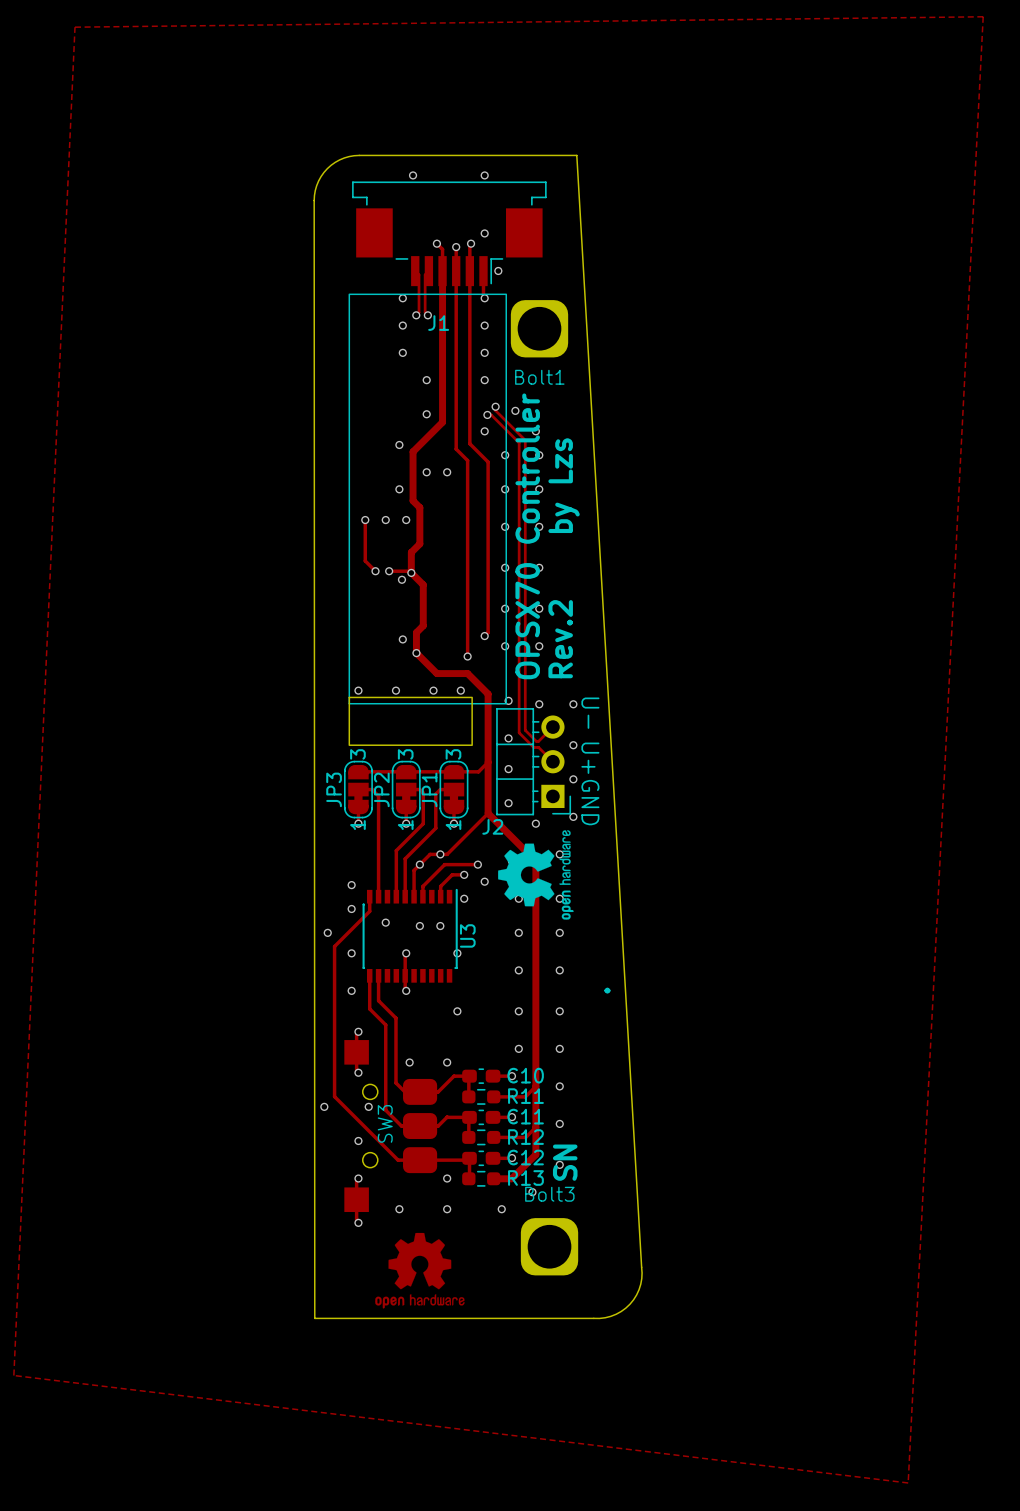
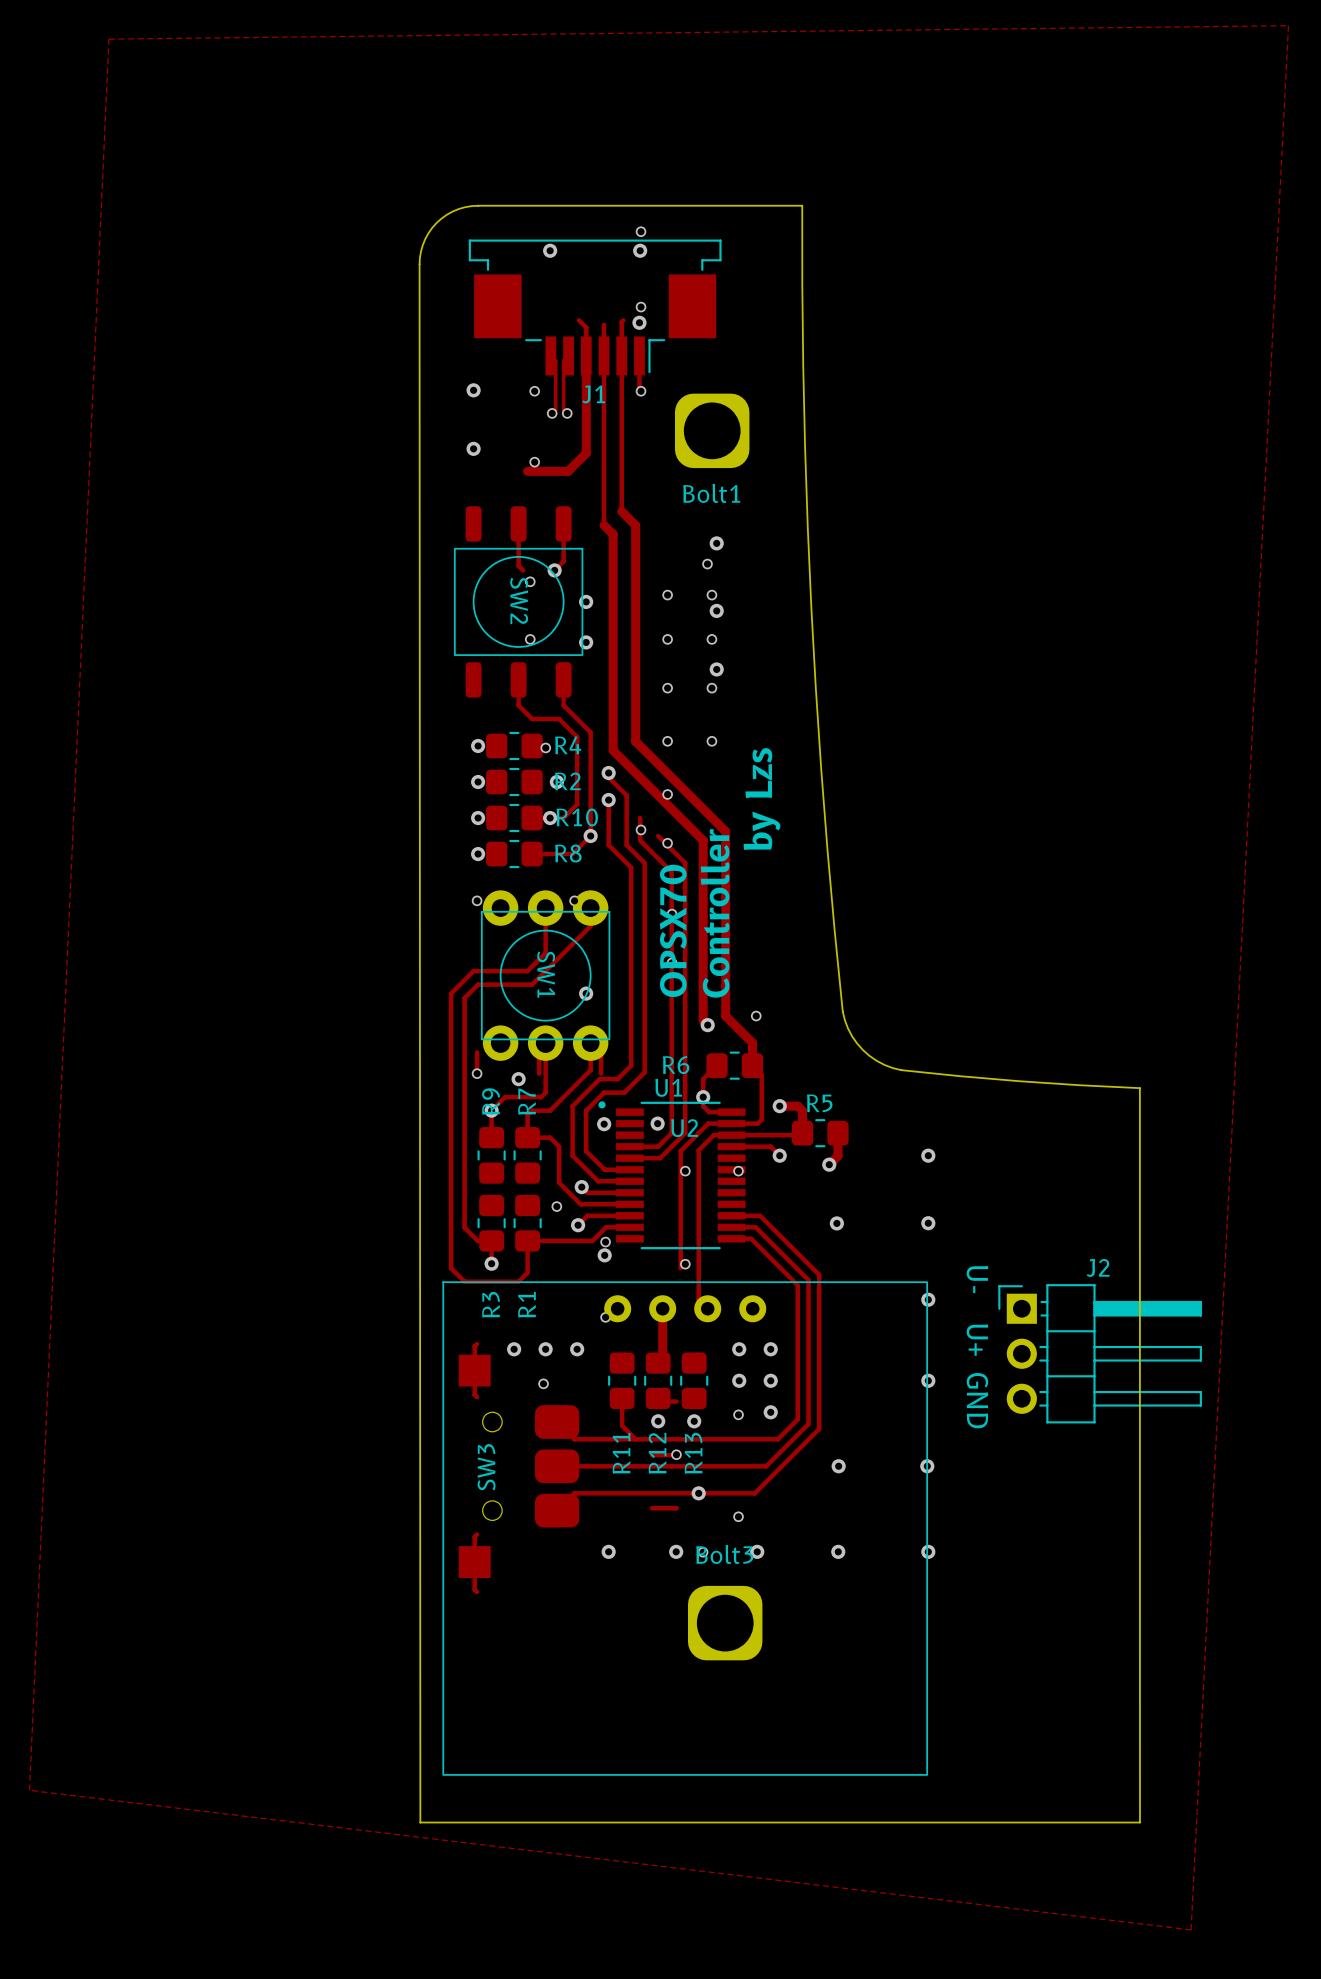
board edge: (576, 155) (642, 1272) (640, 1284) (633, 1299) (625, 1308) (616, 1314) (599, 1318) (314, 1318) -> (760, 205) (802, 205) (805, 447) (811, 609) (827, 850) (842, 1011) (847, 1028) (857, 1043) (869, 1055) (884, 1064) (901, 1070) (1020, 1081) (1139, 1088) (1139, 1822) (420, 1822) (420, 1716)
via: (413, 175) -> none
via: none -> (550, 250)
via: none -> (640, 250)
via: (436, 243) -> none
via: (471, 243) -> none
via: none -> (639, 322)
via: (456, 247) -> none
via: (498, 270) -> none
via: none -> (473, 390)
J1 name position: J1 (438, 323) -> J1 (593, 394)
via: (402, 325) -> none
via: (484, 325) -> none
via: none -> (473, 448)
track: (442, 345) (442, 422) (413, 451) (413, 500) (419, 507) (419, 543) (411, 552) (411, 572) (423, 584) (423, 625) (416, 632) (416, 653) (436, 673) (467, 673) (488, 694) (488, 813) -> (586, 453) (568, 471) (527, 471)
via: (484, 352) -> none
via: (426, 380) -> none
via: (484, 380) -> none
track: (469, 390) (469, 443) (488, 462) (488, 632) (484, 636) -> (621, 511) (635, 525) (635, 741) (725, 831) (725, 1016) (752, 1042) (752, 1065) (761, 1074) (761, 1119) (757, 1123) (708, 1123) (680, 1151) (680, 1268)
track: none -> (518, 523) (518, 565) (523, 570)
track: none -> (563, 523) (563, 561) (554, 570)
track: (456, 401) (456, 449) (467, 460) (467, 656) -> (604, 525) (613, 534) (613, 750) (703, 840) (703, 1020) (707, 1025)
track: (495, 406) (495, 410) (525, 440) (525, 730) (538, 741) (552, 727) -> none
via: (495, 406) -> none
via: (515, 410) -> none
via: (426, 414) -> none
track: (487, 414) (491, 414) (519, 442) (519, 732) (533, 747) (538, 747) (552, 761) -> none
via: (487, 414) -> none
via: none -> (716, 543)
via: (484, 431) -> none
via: none -> (554, 570)
SW2: none -> (518, 601)
via: none -> (586, 601)
via: none -> (716, 610)
via: (426, 472) -> none
via: (447, 472) -> none
via: none -> (586, 642)
via: none -> (716, 669)
part: (427, 519) -> none
track: (365, 520) (365, 560) (375, 571) -> none
via: (365, 520) -> none
via: (385, 520) -> none
track: none -> (518, 679) (518, 705) (532, 718) (559, 718) (577, 736) (577, 804) (563, 818) (532, 818)
via: (406, 520) -> none
track: none -> (563, 679) (563, 705) (590, 732) (590, 836) (572, 854) (532, 854)
text: OPSX70 Controller (527, 536) -> Controller (715, 913)
text: Rev.2 by Lzs (564, 558) -> by Lzs (761, 799)
via: none -> (478, 745)
via: (375, 571) -> none
R4: none -> (514, 745)
track: (389, 571) (409, 571) (413, 574) -> none
via: (389, 571) -> none
via: (401, 579) -> none
track: none -> (608, 773) (608, 777) (626, 795) (626, 845) (644, 863) (644, 1072) (624, 1092) (604, 1092) (586, 1110) (586, 1151) (604, 1169) (629, 1169)
via: none -> (608, 773)
via: none -> (478, 782)
R2: none -> (514, 782)
via: none -> (556, 782)
via: (539, 608) -> none
track: none -> (608, 800) (608, 845) (631, 867) (631, 1065) (617, 1079) (599, 1079) (572, 1106) (572, 1155) (598, 1181) (629, 1181)
via: none -> (608, 800)
via: none -> (478, 818)
R10: none -> (514, 818)
via: none -> (550, 818)
track: none -> (640, 818) (640, 840) (671, 872) (671, 1133) (658, 1146) (629, 1146)
via: (402, 639) -> none
via: none -> (590, 836)
track: none -> (658, 836) (685, 863) (685, 1133) (660, 1158) (629, 1158)
via: (539, 646) -> none
via: (416, 653) -> none
via: none -> (478, 854)
R8: none -> (514, 854)
via: (467, 656) -> none
via: (395, 690) -> none
via: (460, 690) -> none
track: none -> (545, 908) (545, 953) (527, 971) (473, 971) (451, 993) (451, 1268) (464, 1281) (518, 1281) (527, 1272) (527, 1240) (592, 1240) (606, 1227) (629, 1227)
track: none -> (590, 908) (590, 926) (532, 984) (478, 984) (464, 998) (464, 1227) (477, 1240) (491, 1240) (491, 1263)
text: none -> OPSX70 (673, 930)
via: (539, 704) -> none
via: (573, 704) -> none
J2 footprint: [496, 708, 572, 816] -> [998, 1284, 1202, 1424]
text position: U- (590, 713) -> U- (977, 1279)
via: (573, 745) -> none
SW1: none -> (545, 975)
text position: U+ (590, 758) -> U+ (977, 1340)
via: none -> (586, 993)
track: (488, 762) (478, 771) (354, 771) -> none
via: (508, 769) -> none
via: none -> (707, 1025)
track: (358, 789) (372, 789) (378, 796) (378, 896) -> none
JP3: (358, 789) -> none
track: (406, 789) (419, 789) (423, 792) (423, 823) (396, 850) (396, 896) -> none
JP2: (406, 789) -> none
track: (453, 789) (440, 789) (435, 794) (435, 828) (405, 858) (405, 896) -> none
JP1: (453, 789) -> none
track: none -> (545, 1043) (545, 1092) (541, 1097) (505, 1097) (491, 1110) (491, 1137)
track: none -> (590, 1043) (590, 1070) (550, 1110) (532, 1110) (527, 1115) (527, 1137) (550, 1137) (559, 1146) (559, 1182) (580, 1204) (629, 1204)
text position: GND (590, 802) -> GND (977, 1400)
via: (508, 803) -> none
track: (488, 813) (447, 854) (430, 854) (414, 870) (414, 896) -> none
track: (488, 813) (535, 861) (535, 1154) (511, 1178) (493, 1178) -> none
via: (573, 816) -> none
track: none -> (716, 1065) (703, 1079) (703, 1106) (709, 1112) (731, 1112)
R6: none -> (734, 1065)
via: (406, 823) -> none
via: (453, 823) -> none
via: (535, 823) -> none
J2 name position: J2 (492, 826) -> J2 (1098, 1267)
via: none -> (518, 1079)
drawing: [498, 830, 574, 920] -> none
via: none -> (703, 1097)
track: none -> (779, 1106) (797, 1106) (802, 1110) (802, 1133) (800, 1135) (713, 1135) (698, 1150) (698, 1299) (707, 1308)
via: none -> (779, 1106)
via: none -> (491, 1110)
via: (440, 854) -> none
via: (559, 854) -> none
via: none -> (604, 1124)
via: none -> (657, 1123)
via: (419, 864) -> none
track: (477, 864) (444, 864) (422, 886) (422, 896) -> none
via: (477, 864) -> none
R5: none -> (820, 1133)
track: none -> (837, 1133) (837, 1155) (829, 1164)
track: (464, 874) (452, 874) (440, 886) (440, 896) -> none
via: (464, 874) -> none
track: none -> (731, 1146) (770, 1146) (779, 1155)
via: (484, 881) -> none
via: (351, 885) -> none
R9: none -> (491, 1155)
R7: none -> (527, 1155)
via: none -> (779, 1155)
via: none -> (928, 1155)
via: none -> (829, 1164)
track: (369, 896) (369, 911) (334, 946) (334, 1096) (398, 1160) (467, 1160) (469, 1158) (468, 1178) -> none
via: (464, 898) -> none
U1: none -> (671, 1175)
via: (351, 908) -> none
track: none -> (581, 1187) (587, 1192) (629, 1192)
via: none -> (581, 1187)
via: (385, 922) -> none
via: (440, 926) -> none
via: (327, 932) -> none
via: (518, 932) -> none
via: (559, 932) -> none
track: none -> (629, 1215) (587, 1215) (578, 1225)
track: none -> (731, 1215) (760, 1215) (819, 1274) (819, 1429) (754, 1493) (574, 1493) (557, 1510)
U3: (410, 935) -> none
R3: none -> (491, 1223)
R1: none -> (527, 1223)
via: none -> (928, 1223)
via: none -> (836, 1223)
via: none -> (578, 1225)
track: none -> (731, 1238) (751, 1238) (797, 1285) (797, 1419) (777, 1439) (574, 1439) (557, 1422)
via: (351, 953) -> none
track: (406, 953) (406, 990) -> none
via: (406, 953) -> none
via: none -> (604, 1255)
via: none -> (491, 1263)
via: (559, 970) -> none
track: (369, 975) (369, 1008) (385, 1024) (385, 1110) (401, 1126) (420, 1126) -> none
track: (378, 975) (378, 1000) (395, 1018) (395, 1082) (404, 1091) (438, 1091) (453, 1076) (469, 1076) (468, 1096) -> none
via: (351, 990) -> none
via: (406, 990) -> none
text: . (607, 990) -> none
via: none -> (928, 1299)
track: none -> (662, 1308) (662, 1358) (658, 1363)
via: (518, 1011) -> none
via: (559, 1011) -> none
via: (358, 1031) -> none
via: none -> (514, 1349)
via: none -> (545, 1349)
via: none -> (577, 1349)
via: none -> (739, 1349)
via: none -> (770, 1349)
via: (518, 1048) -> none
via: (559, 1048) -> none
via: none -> (739, 1380)
via: none -> (770, 1380)
via: none -> (928, 1380)
via: (447, 1062) -> none
via: (358, 1072) -> none
track: none -> (622, 1398) (622, 1425) (635, 1439)
C10: (481, 1076) -> none
via: (511, 1076) -> none
via: none -> (770, 1412)
track: (535, 1086) (525, 1096) (493, 1096) -> none
R11 footprint: [462, 1088, 501, 1105] -> [608, 1352, 637, 1410]
via: none -> (658, 1421)
via: none -> (694, 1421)
R11 name position: R11 (525, 1096) -> R11 (621, 1453)
via: (324, 1106) -> none
via: (368, 1106) -> none
C11: (481, 1117) -> none
SW3 name position: SW3 (385, 1123) -> SW3 (486, 1467)
via: (559, 1123) -> none
via: none -> (838, 1466)
via: none -> (927, 1466)
track: (438, 1126) (447, 1117) (469, 1117) (468, 1137) -> (580, 1466) (766, 1466) (808, 1424) (808, 1280) (755, 1227) (731, 1227)
track: (535, 1127) (525, 1137) (493, 1137) -> none
R12 footprint: [462, 1129, 501, 1146] -> [644, 1352, 673, 1410]
R12 name position: R12 (525, 1137) -> R12 (657, 1453)
via: (358, 1140) -> none
via: none -> (698, 1493)
C12: (481, 1158) -> none
via: (511, 1158) -> none
text: SN (565, 1162) -> none
R13 footprint: [462, 1170, 501, 1187] -> [680, 1352, 709, 1410]
U2: none -> (685, 1528)
via: (358, 1178) -> none
via: (447, 1178) -> none
R13 name position: R13 (525, 1178) -> R13 (693, 1453)
via: none -> (608, 1551)
via: none -> (676, 1551)
via: none -> (757, 1551)
via: none -> (838, 1551)
via: none -> (928, 1551)
via: (399, 1209) -> none
via: (447, 1209) -> none
via: (501, 1209) -> none
via: (358, 1222) -> none
drawing: [375, 1232, 465, 1309] -> none

